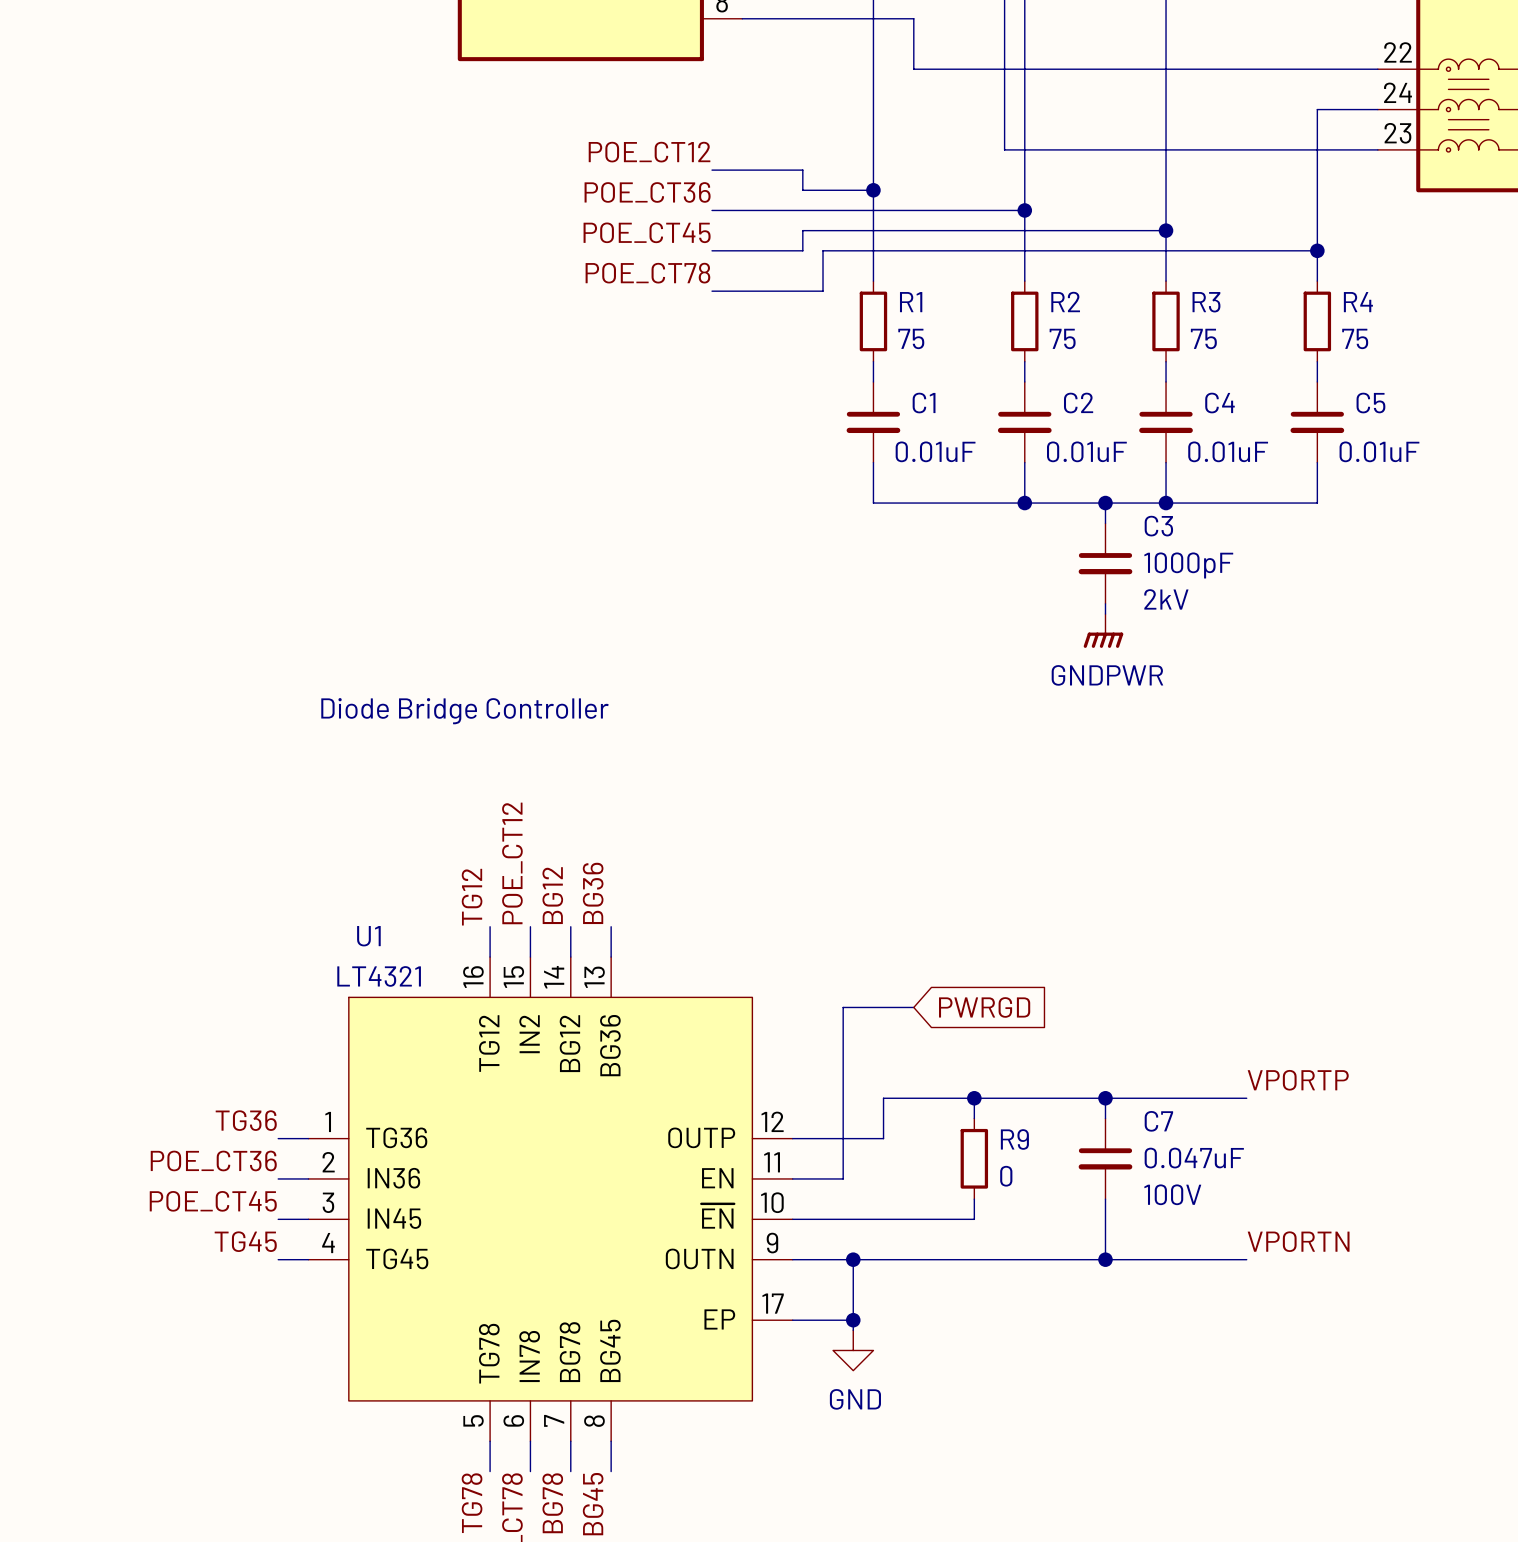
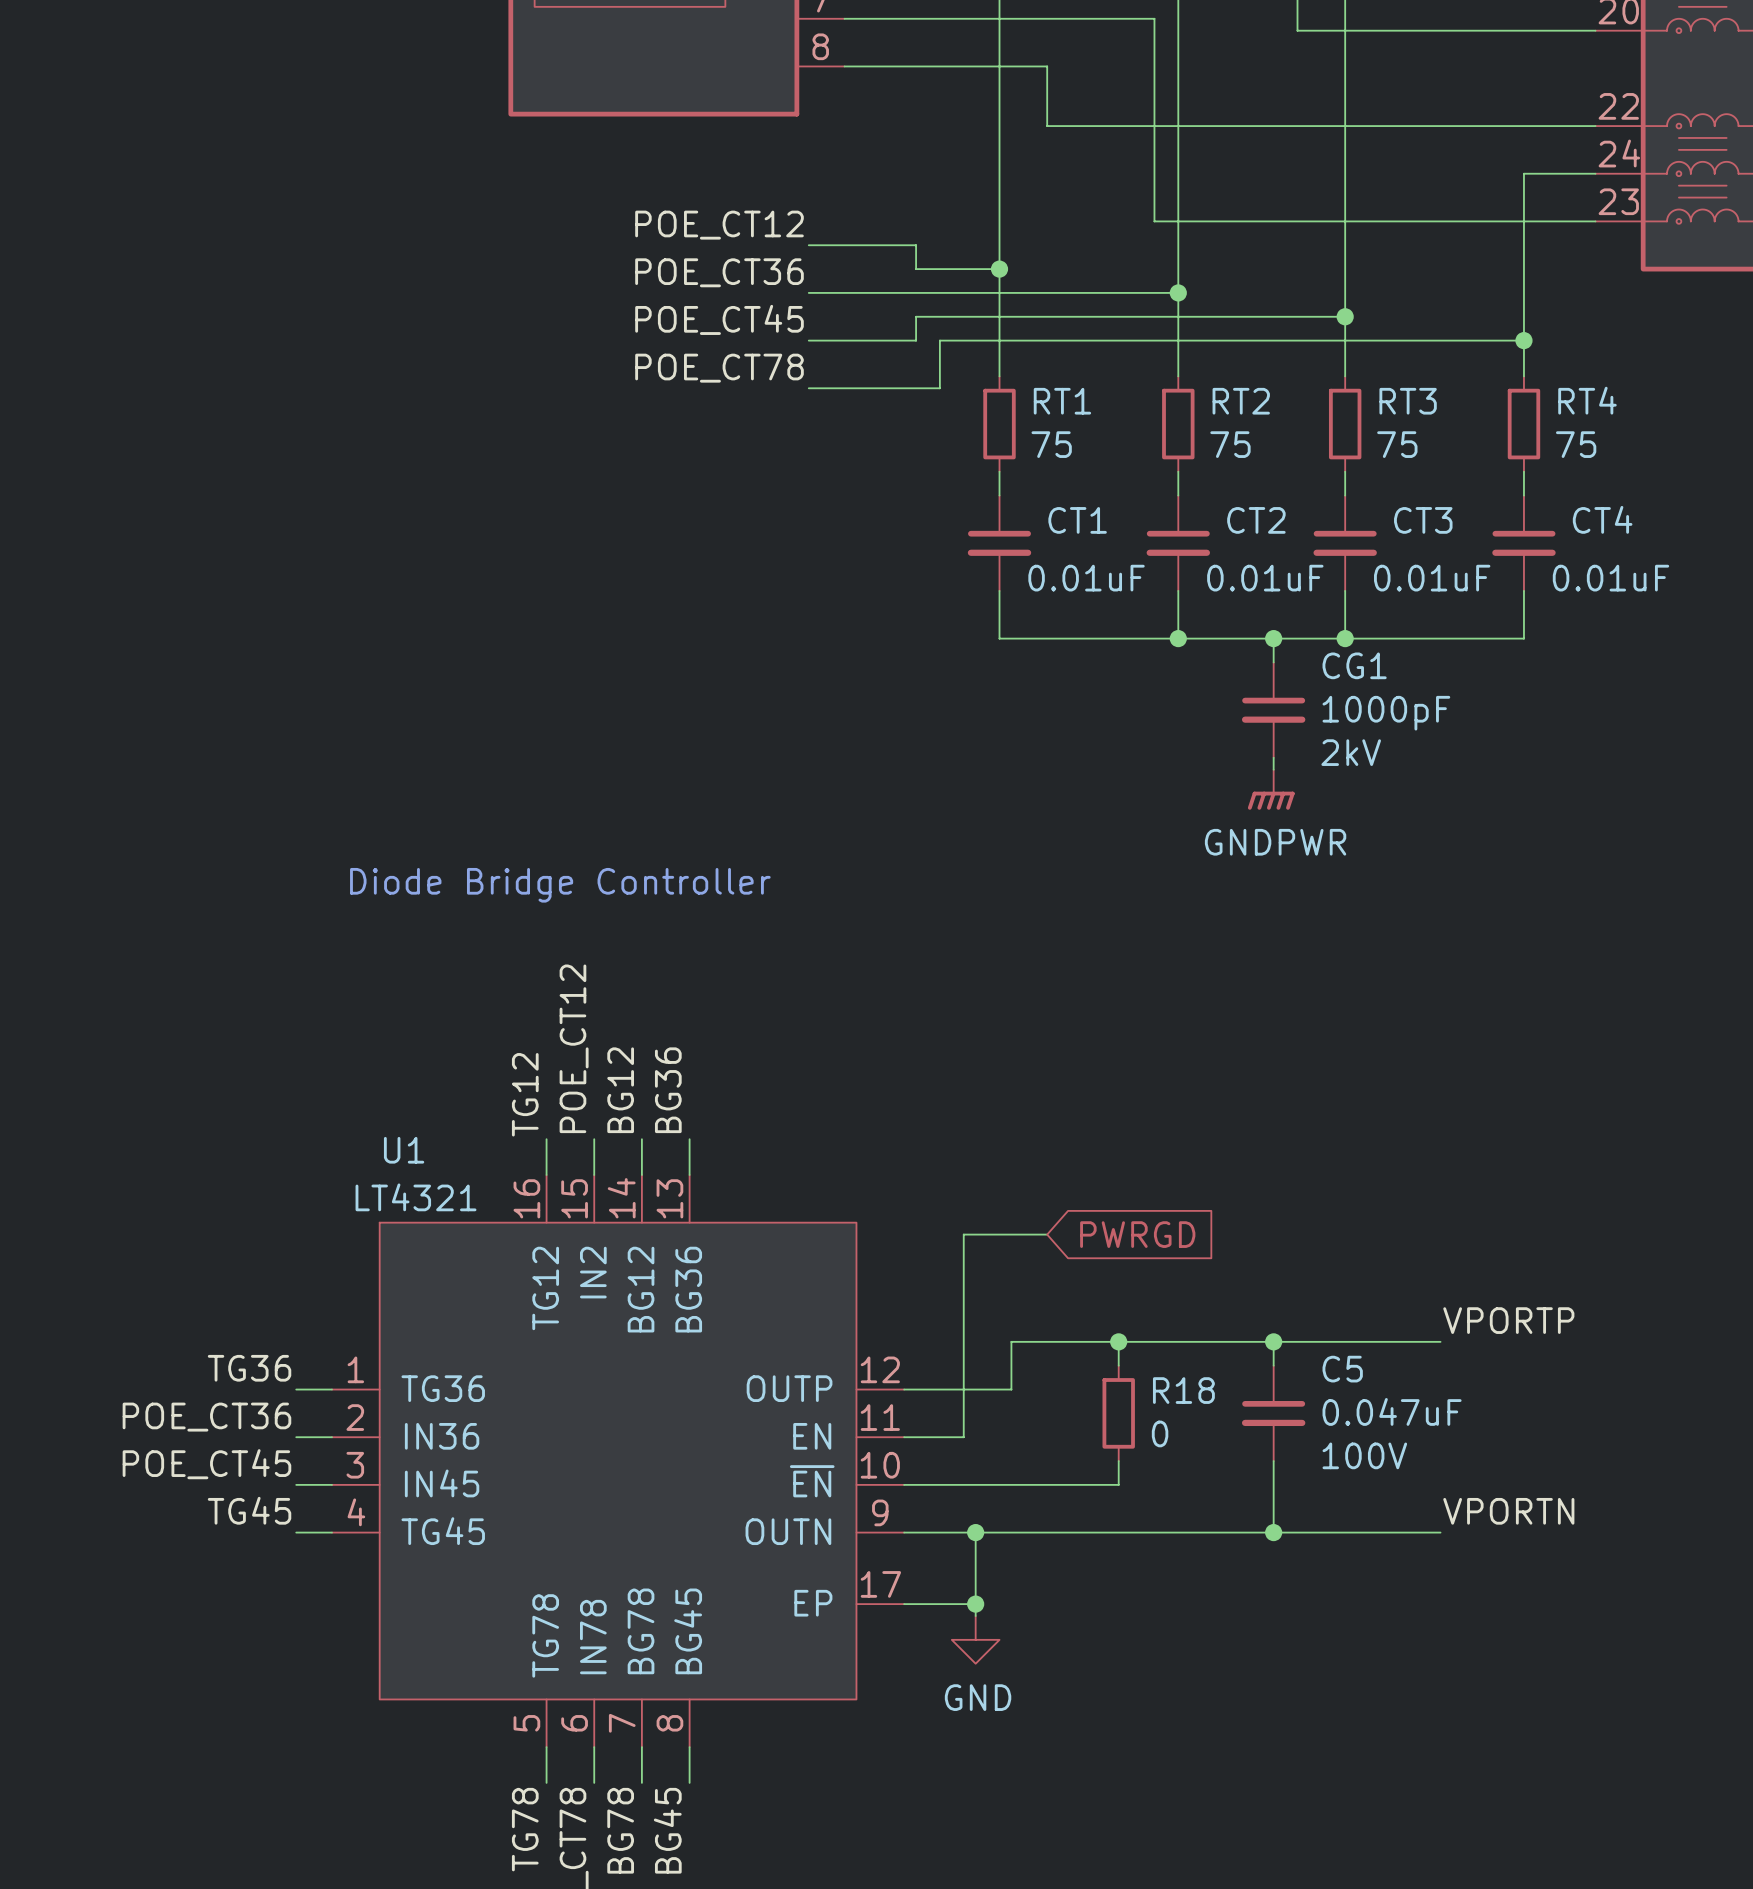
R1 name: R1 (911, 302) -> RT1 (1062, 401)
R2 name: R2 (1065, 302) -> RT2 (1241, 401)
R3 name: R3 (1206, 302) -> RT3 (1408, 401)
R4 name: R4 (1358, 302) -> RT4 (1587, 400)
C1 name: C1 (924, 403) -> CT1 (1077, 520)
C2 name: C2 (1078, 403) -> CT2 (1256, 520)
C4 name: C4 (1219, 403) -> CT3 (1423, 520)
C5 name: C5 (1370, 403) -> CT4 (1602, 519)
C3 name: C3 (1158, 526) -> CG1 (1354, 665)
C7 name: C7 (1158, 1121) -> C5 (1342, 1369)
R9 name: R9 (1014, 1139) -> R18 (1183, 1390)

